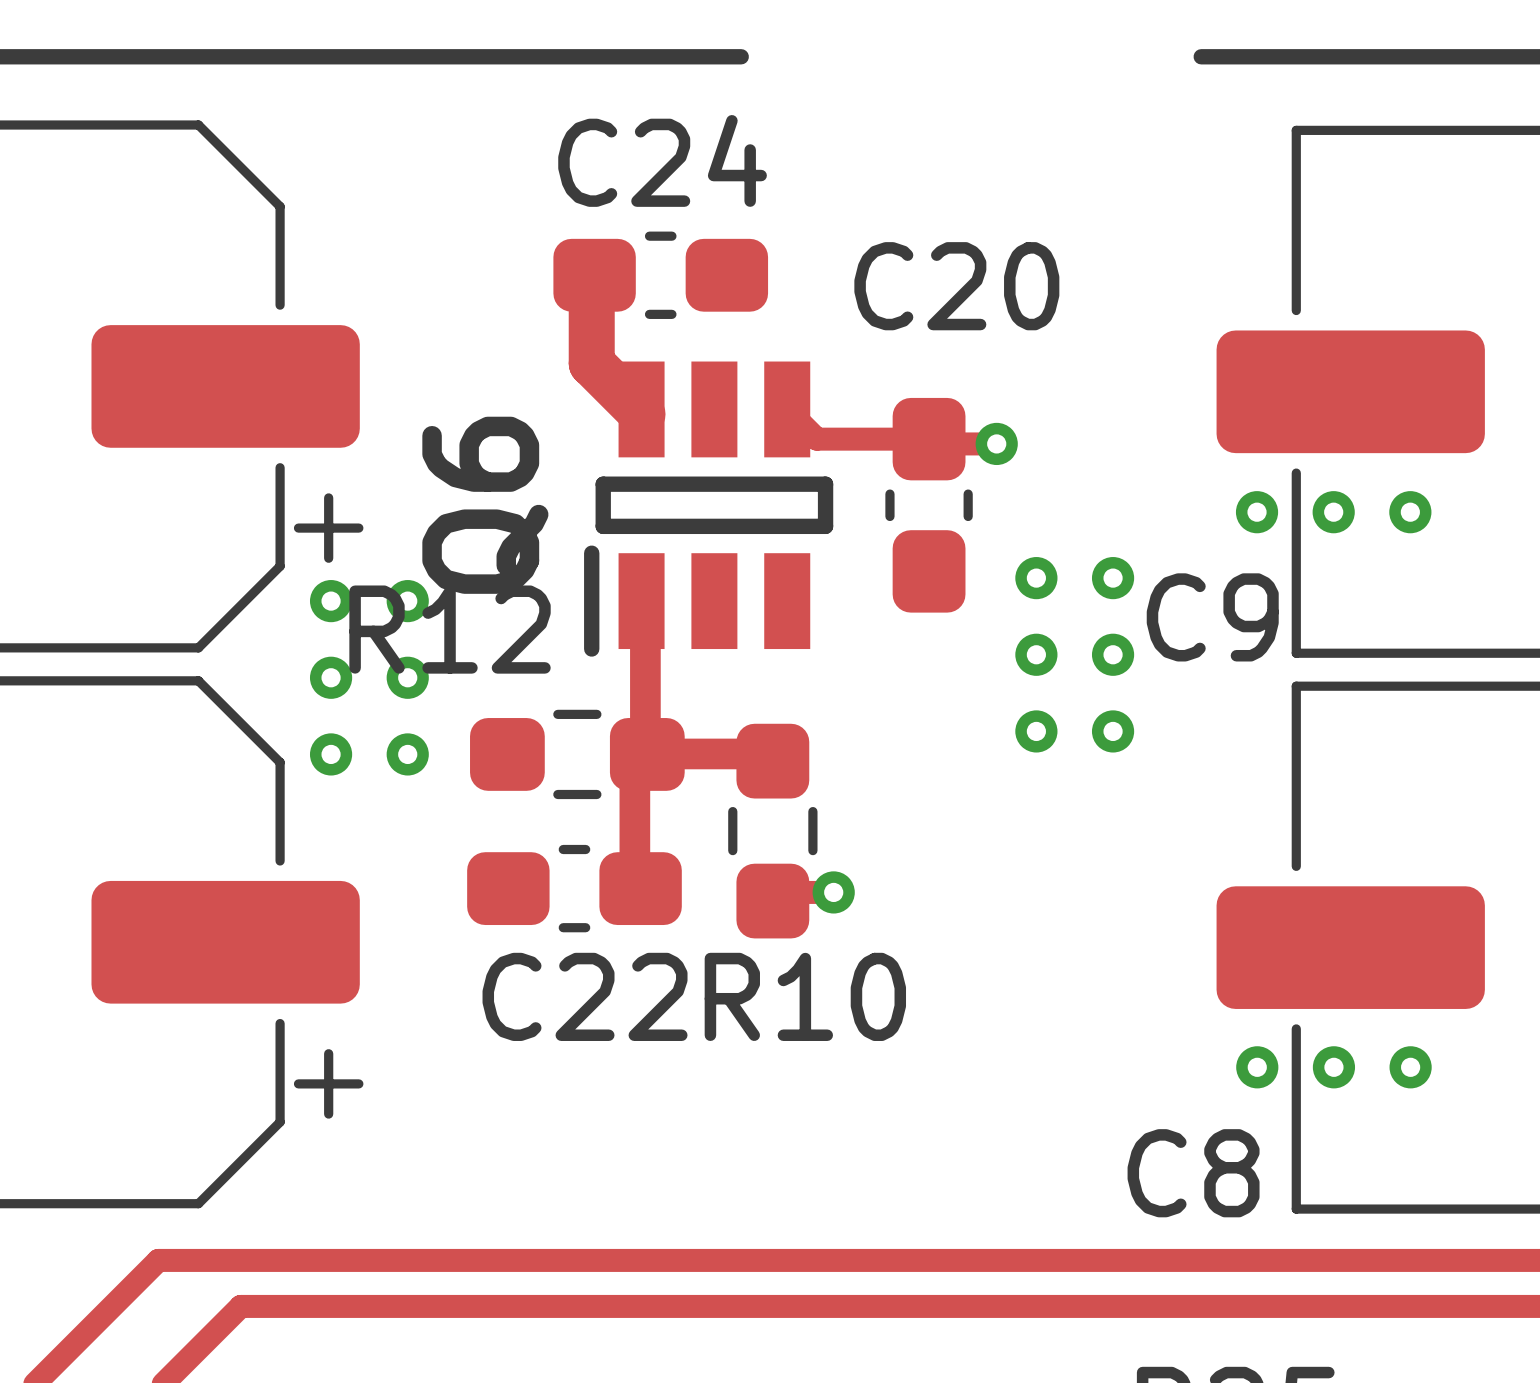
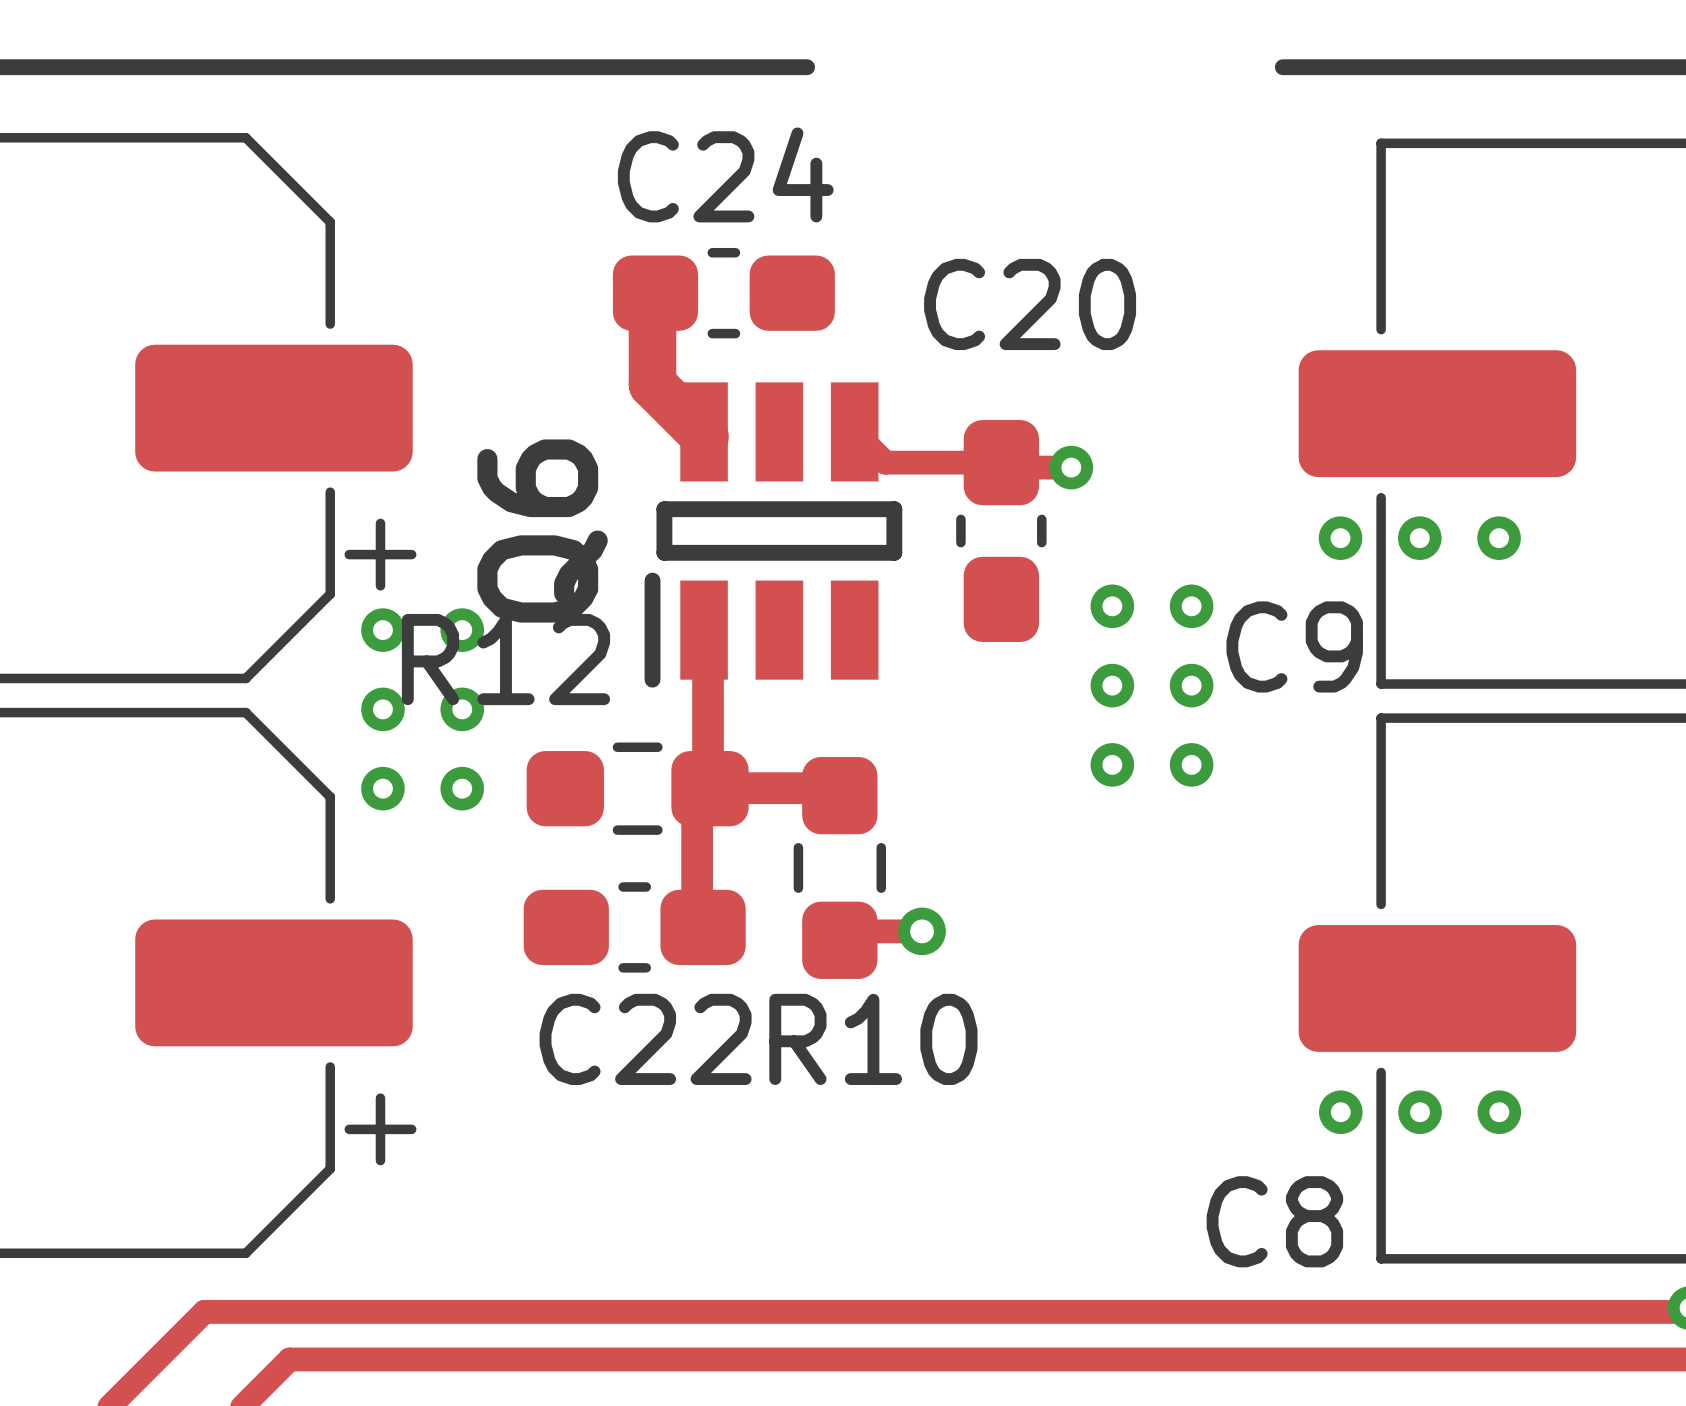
via position: (833, 892) -> (922, 931)

